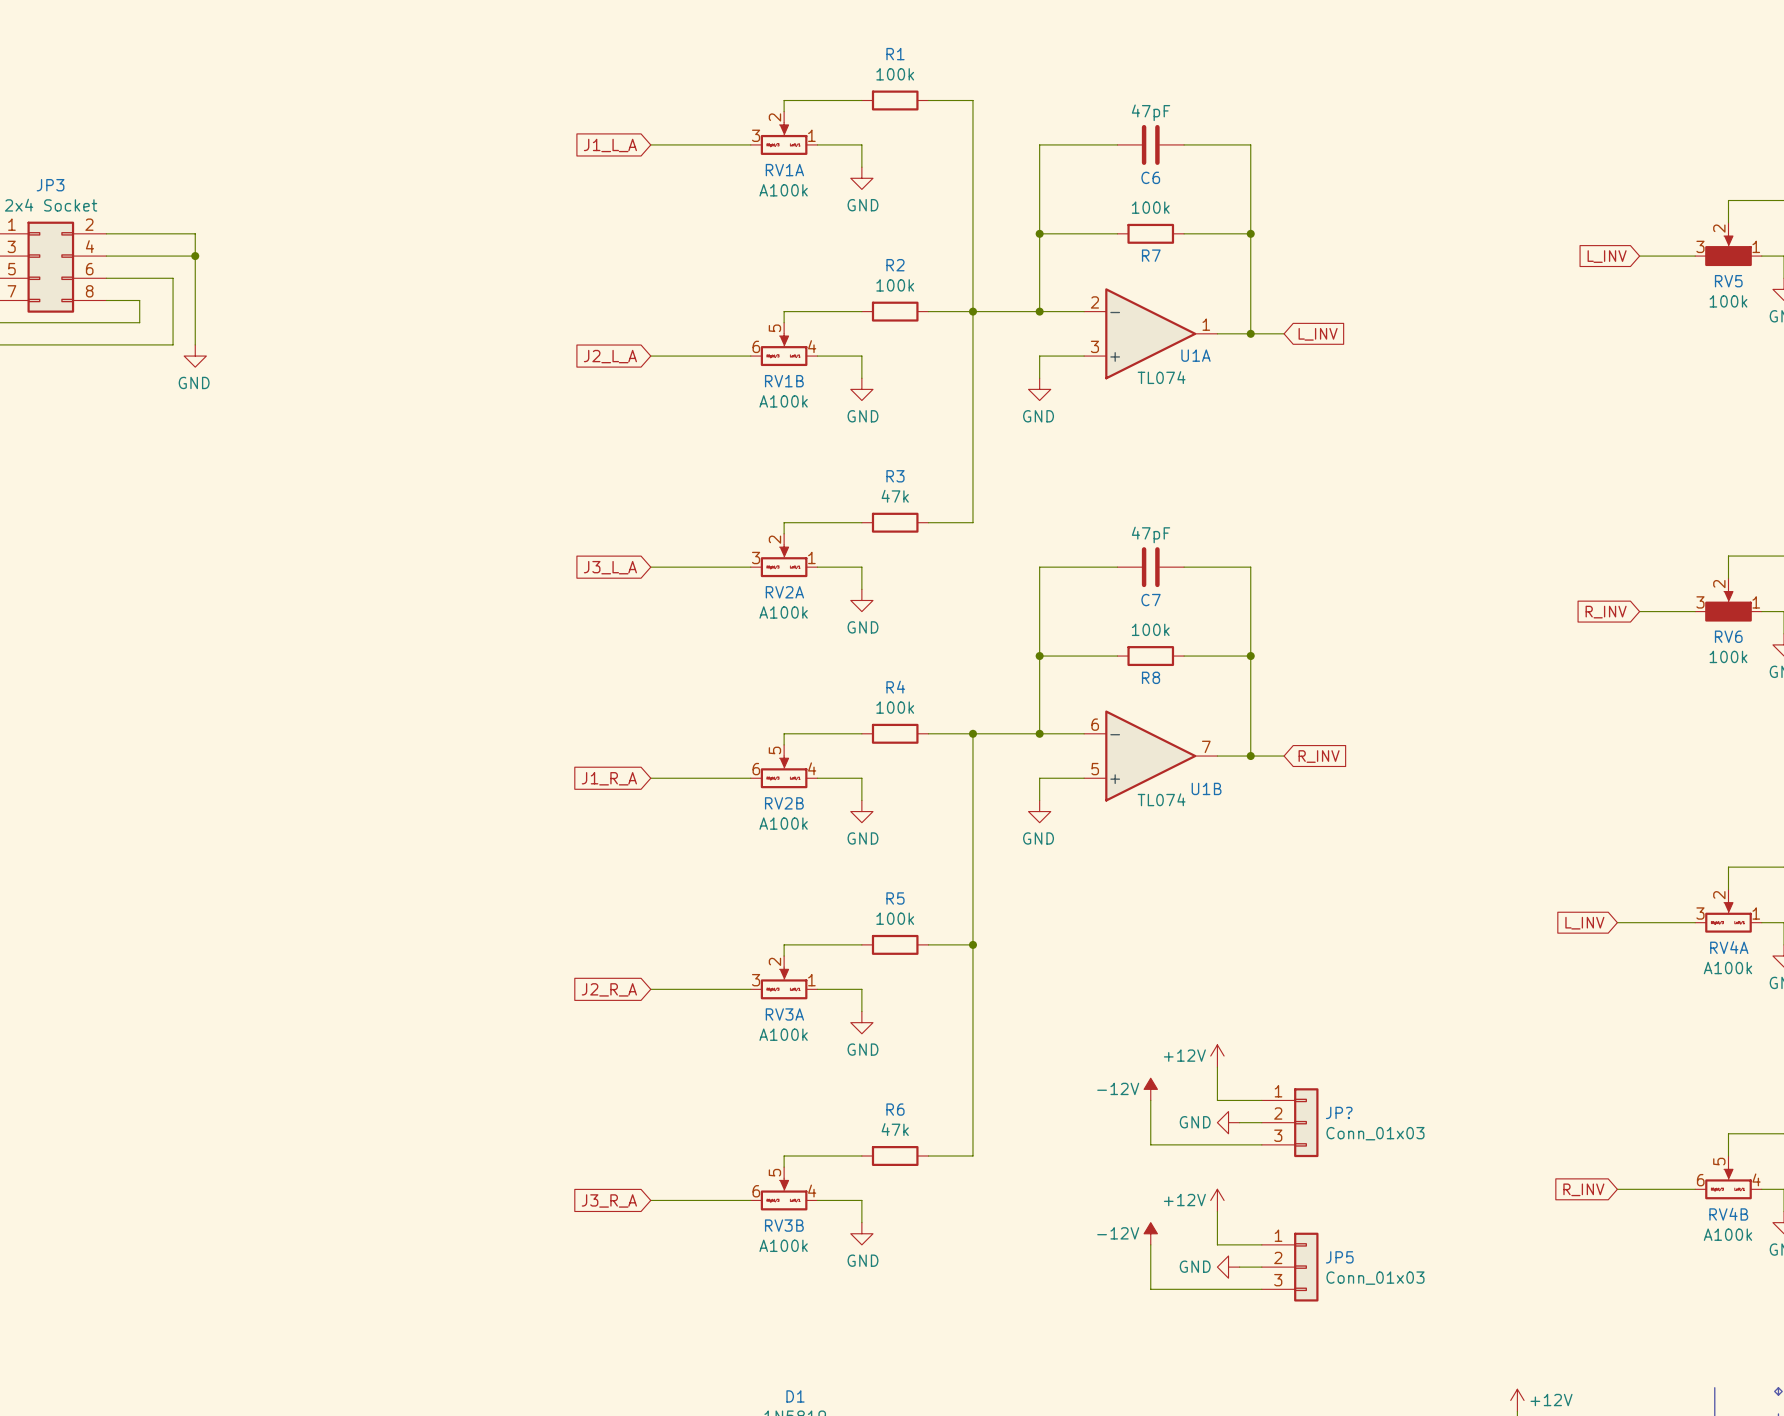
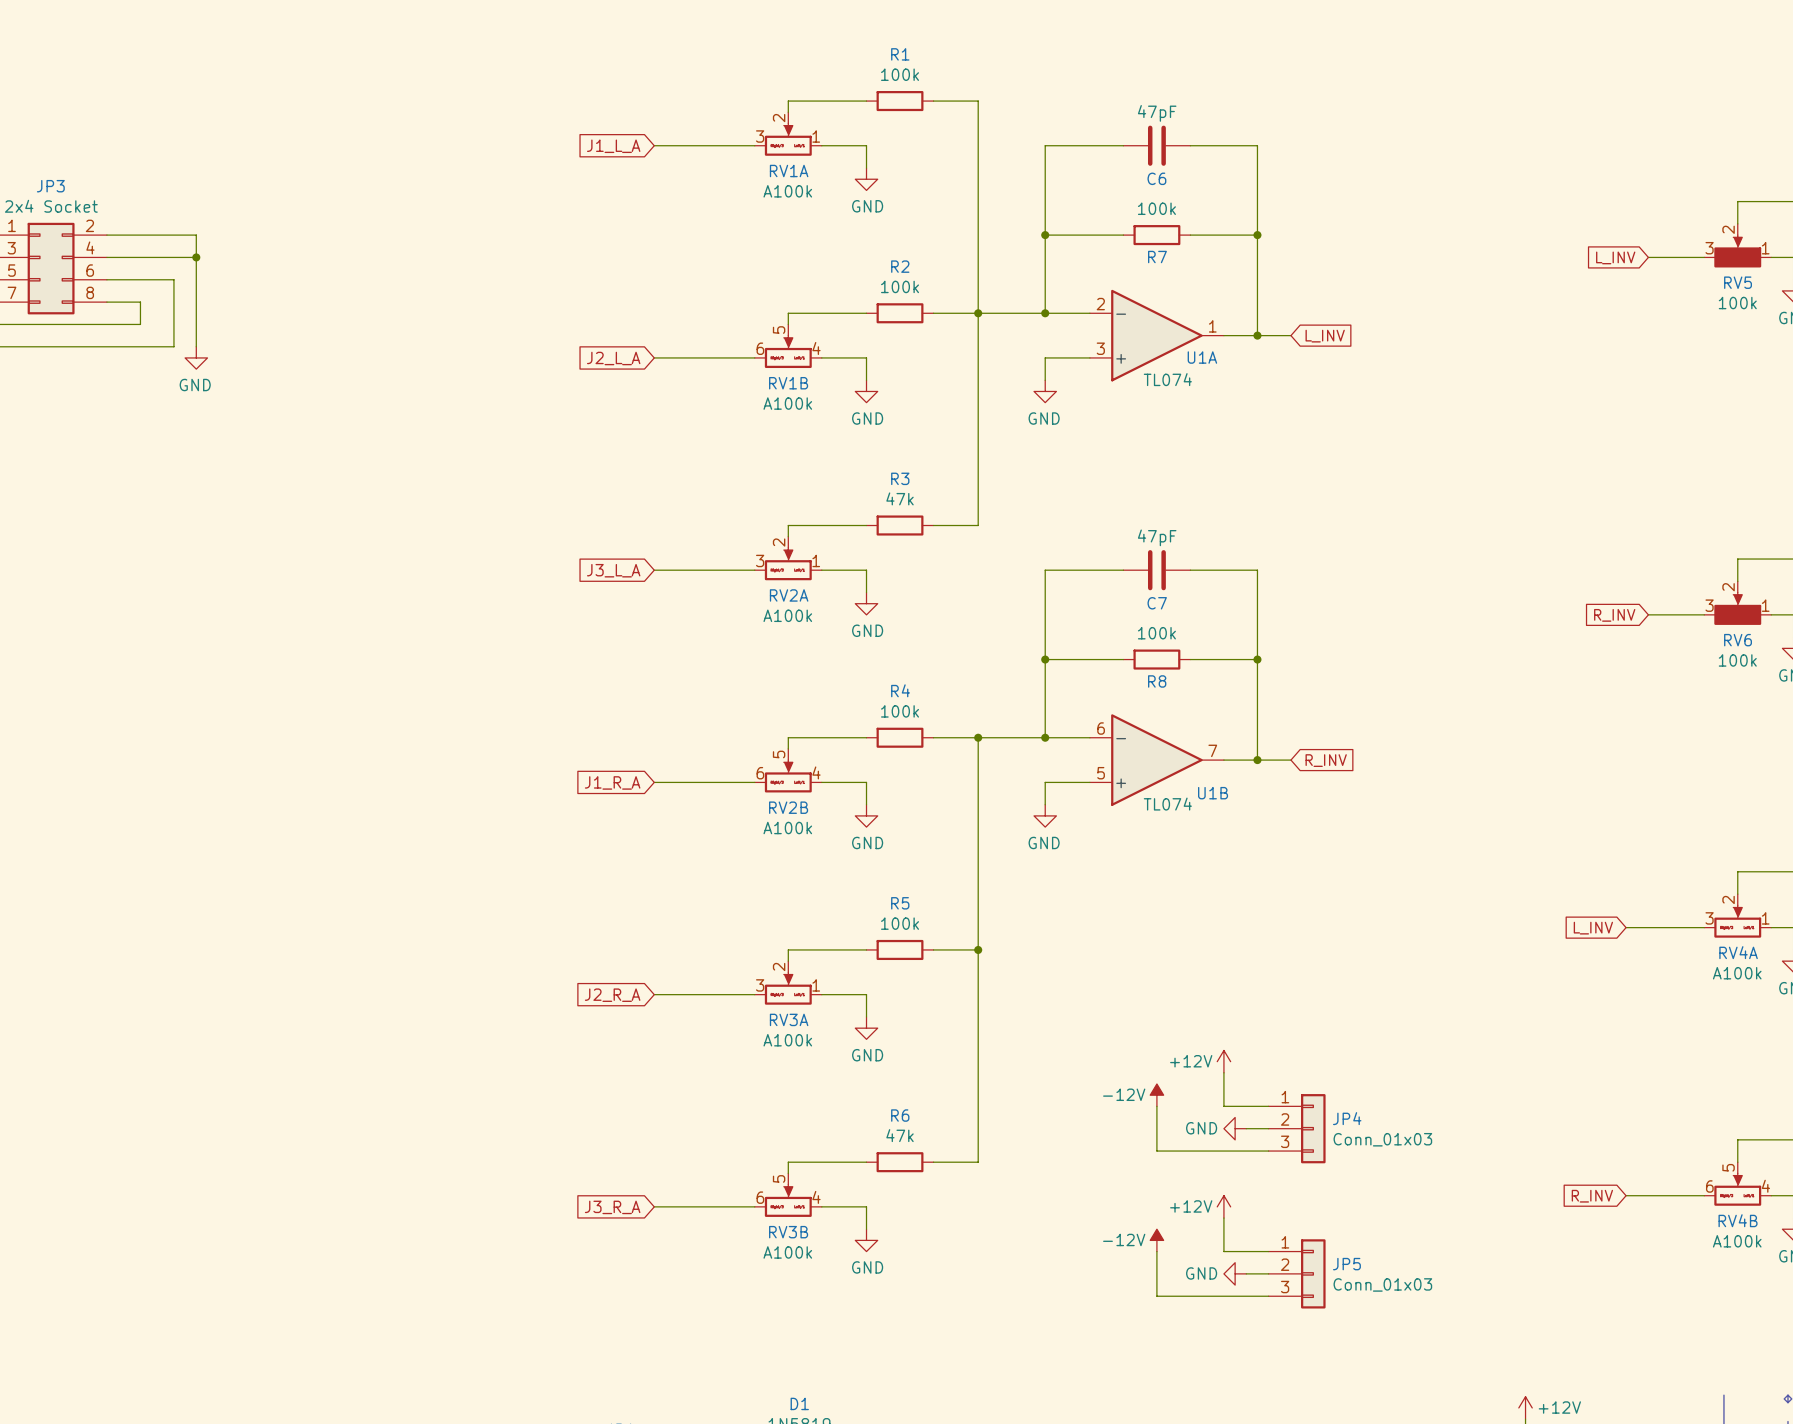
JP? name: JP? (1339, 1112) -> JP4 (1347, 1118)

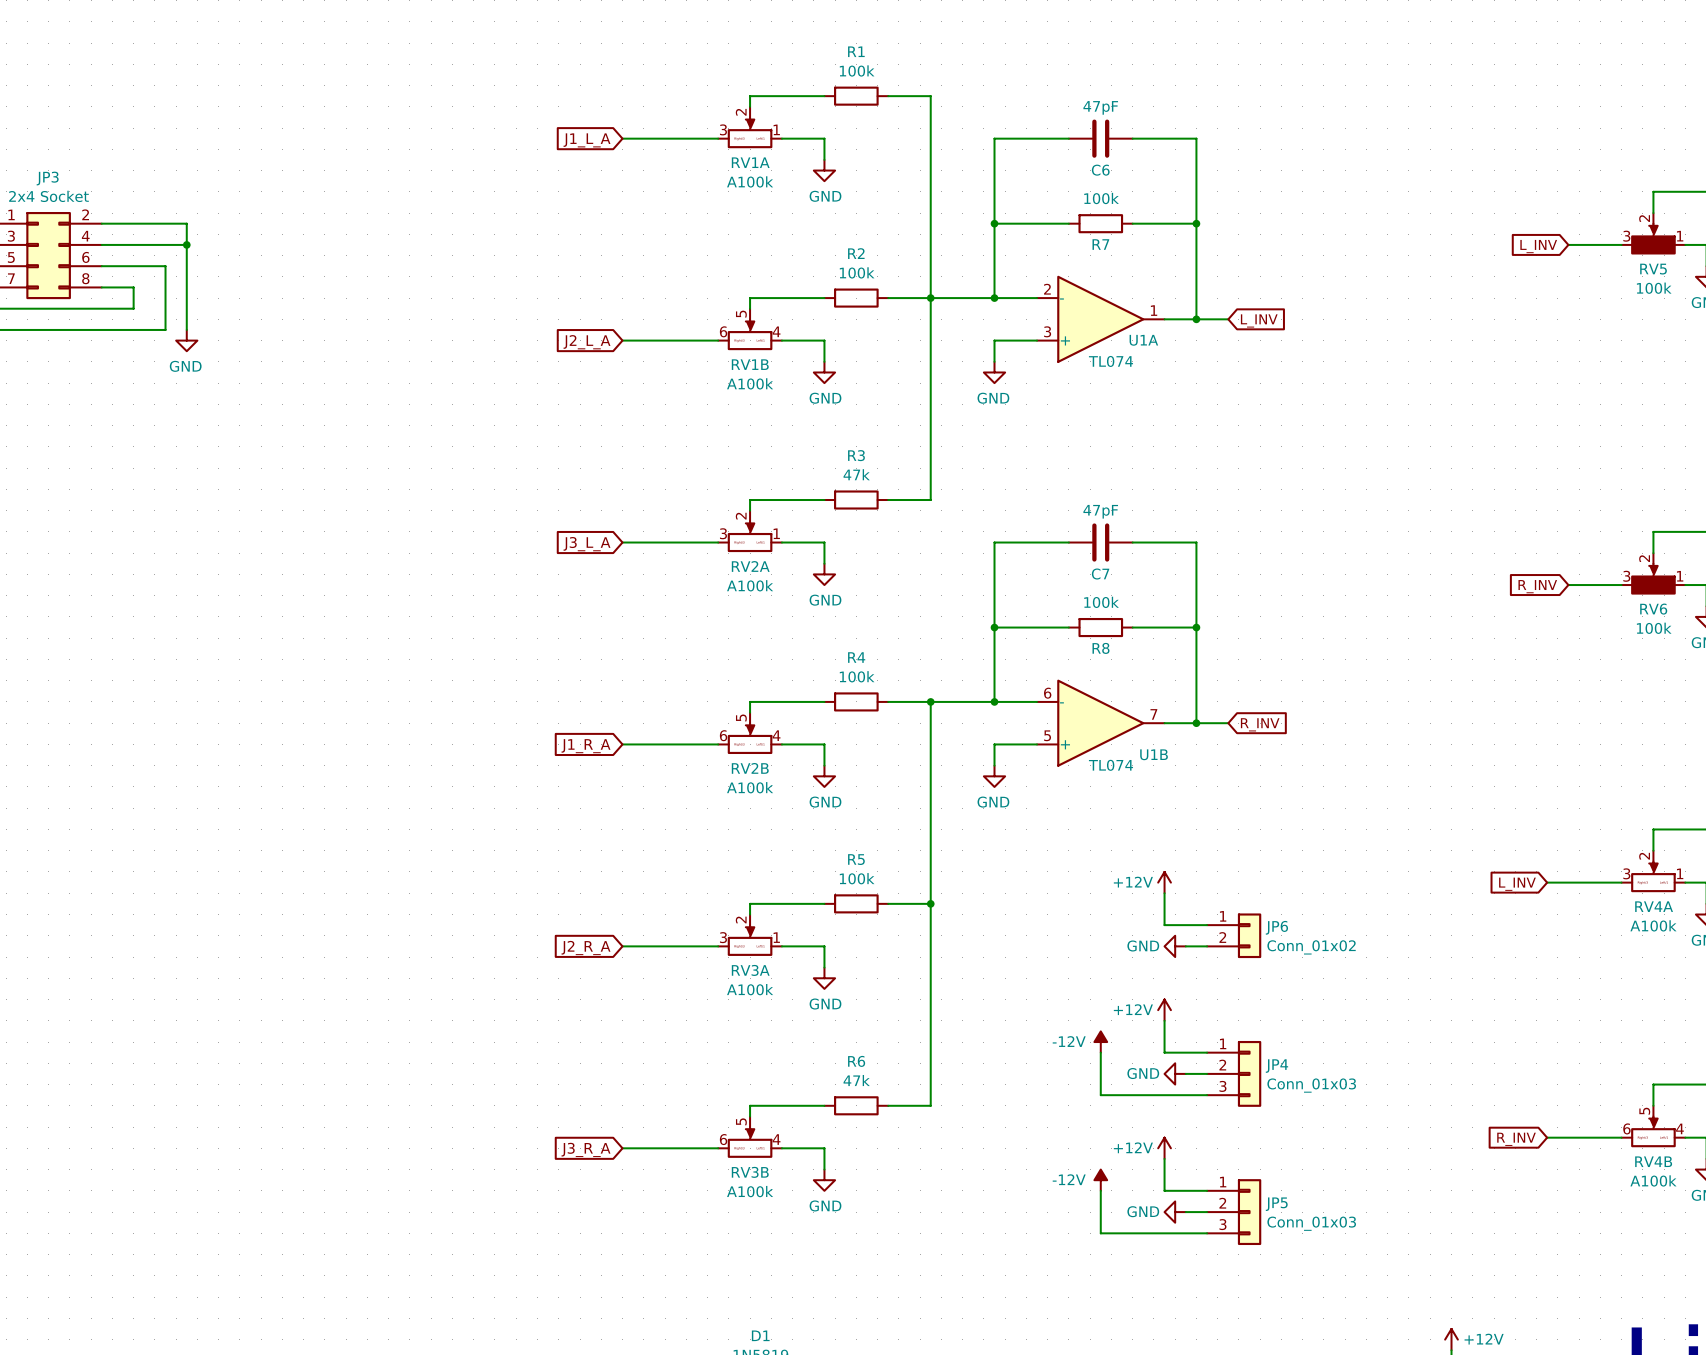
power symbol: none -> +12V (1164, 882)
wire: none -> (1164, 893) (1164, 925) (1207, 925)
JP6: none -> Conn_01x02 (1234, 935)
power symbol: none -> GND (1175, 946)
wire: none -> (1185, 946) (1207, 946)

